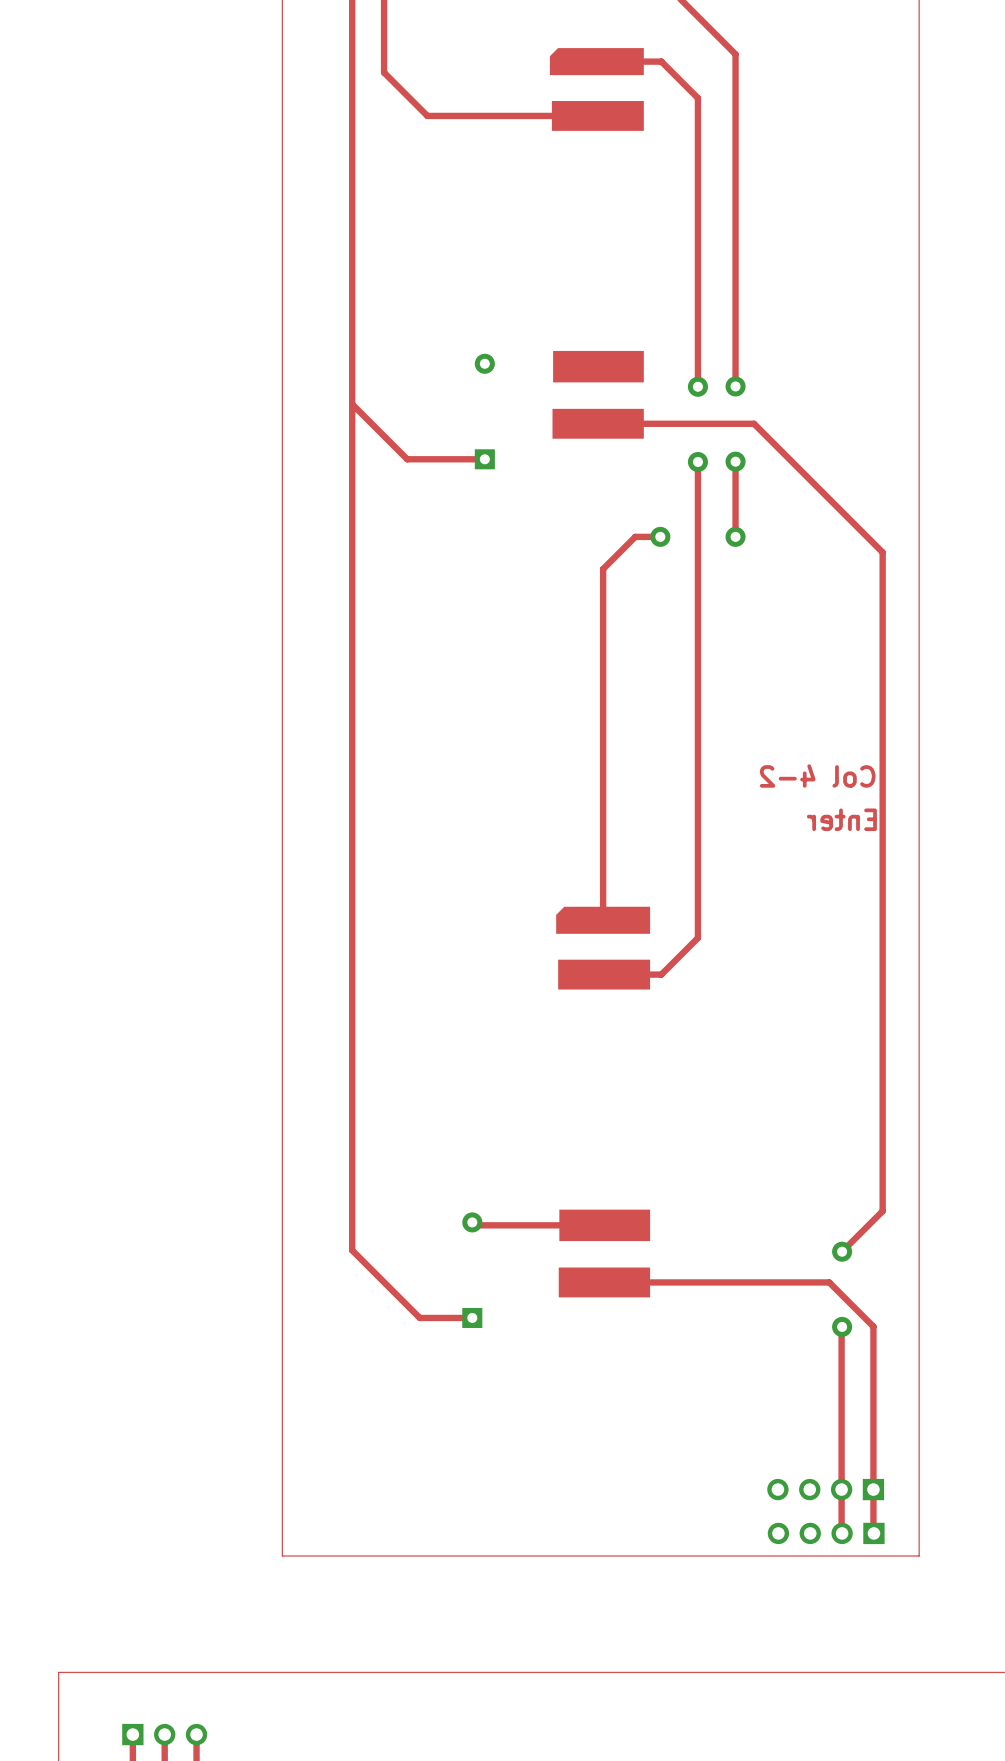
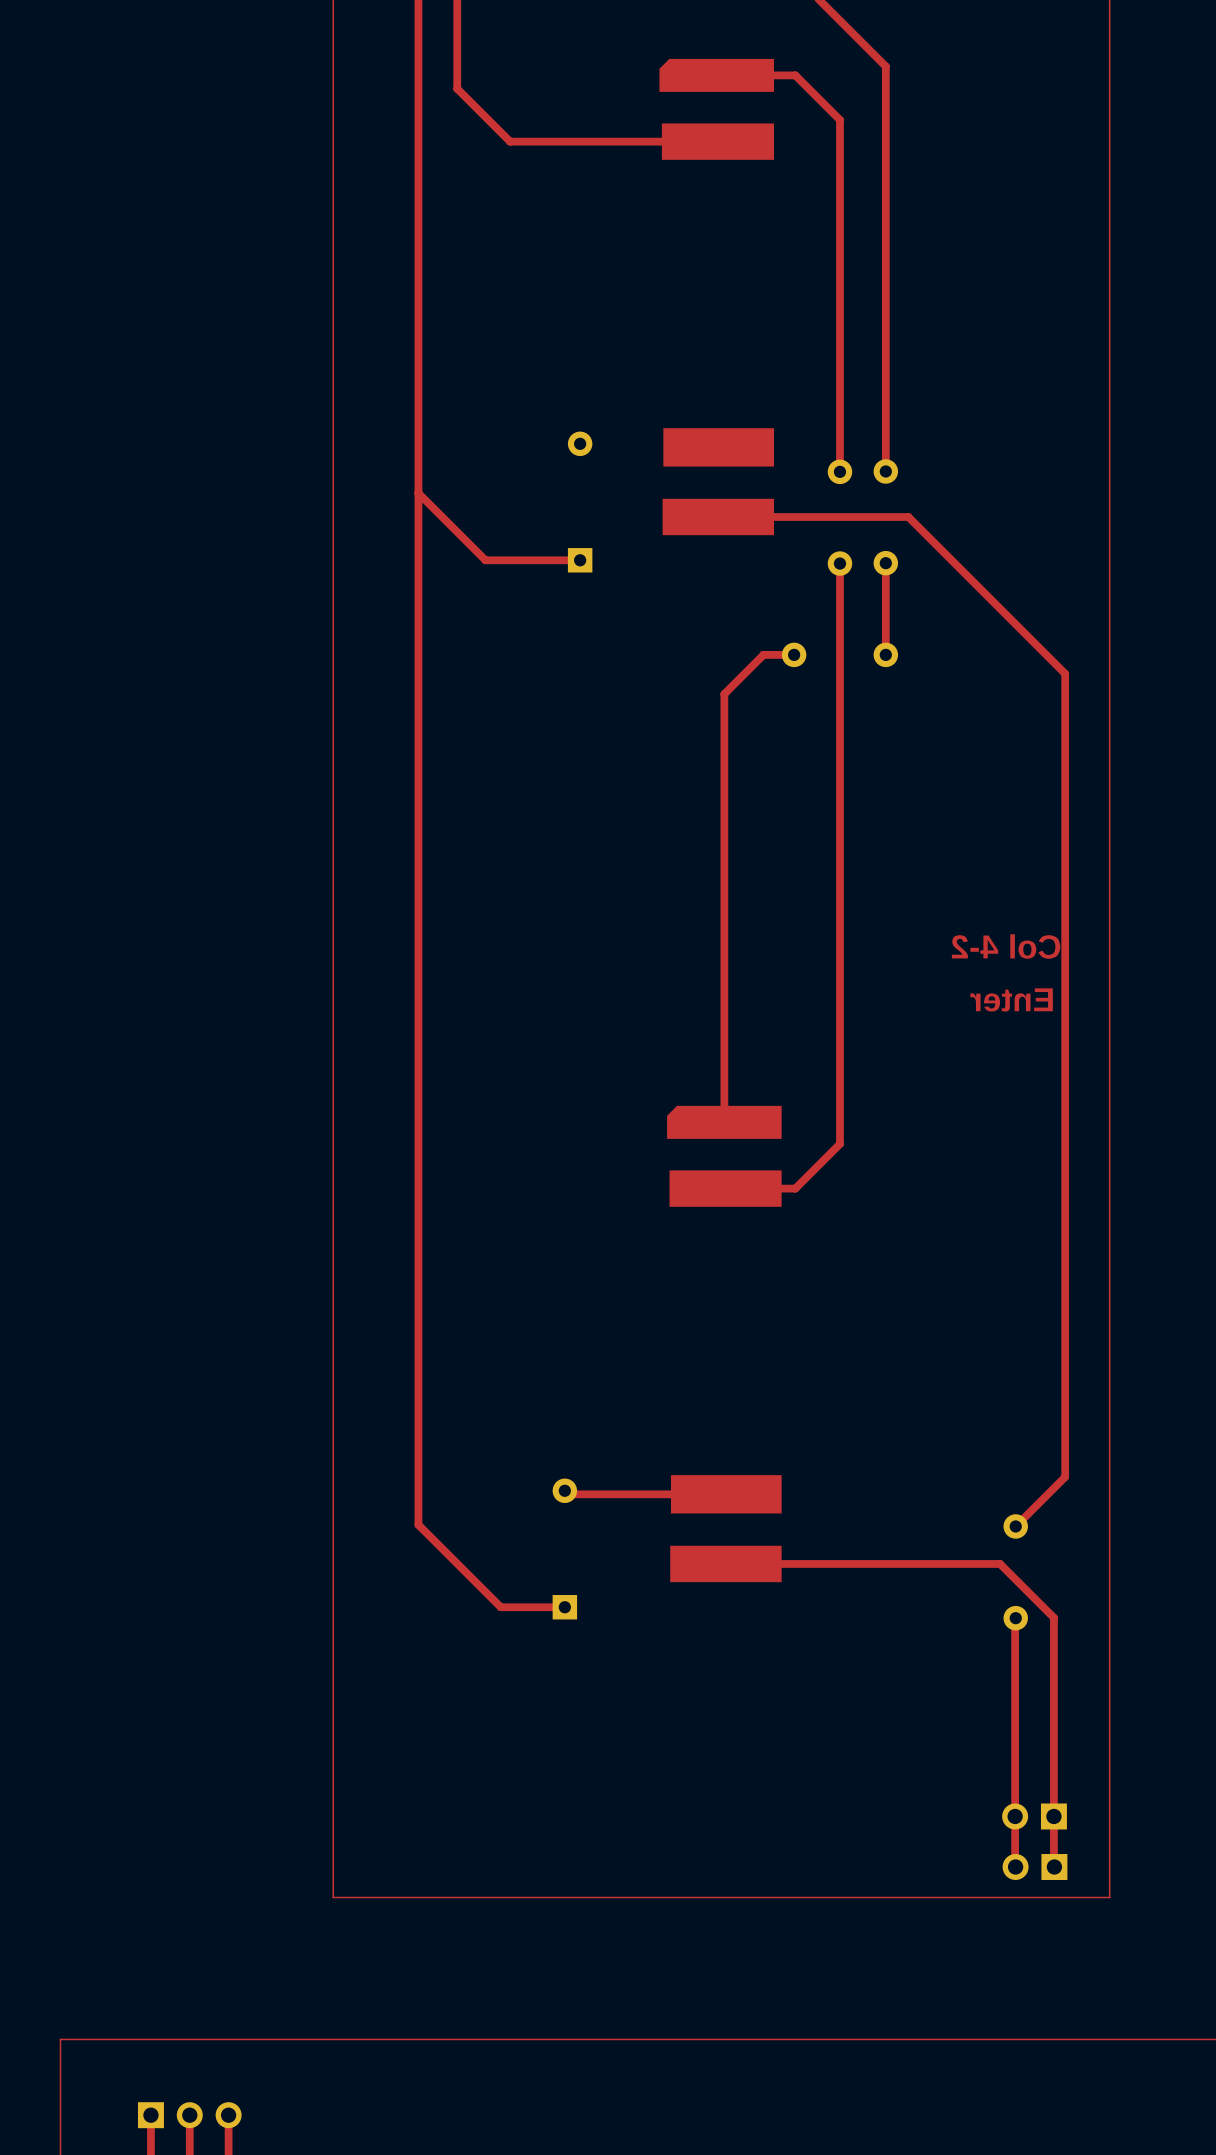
part: (825, 1489) -> none
part: none -> (1034, 1867)
part: (826, 1533) -> none

